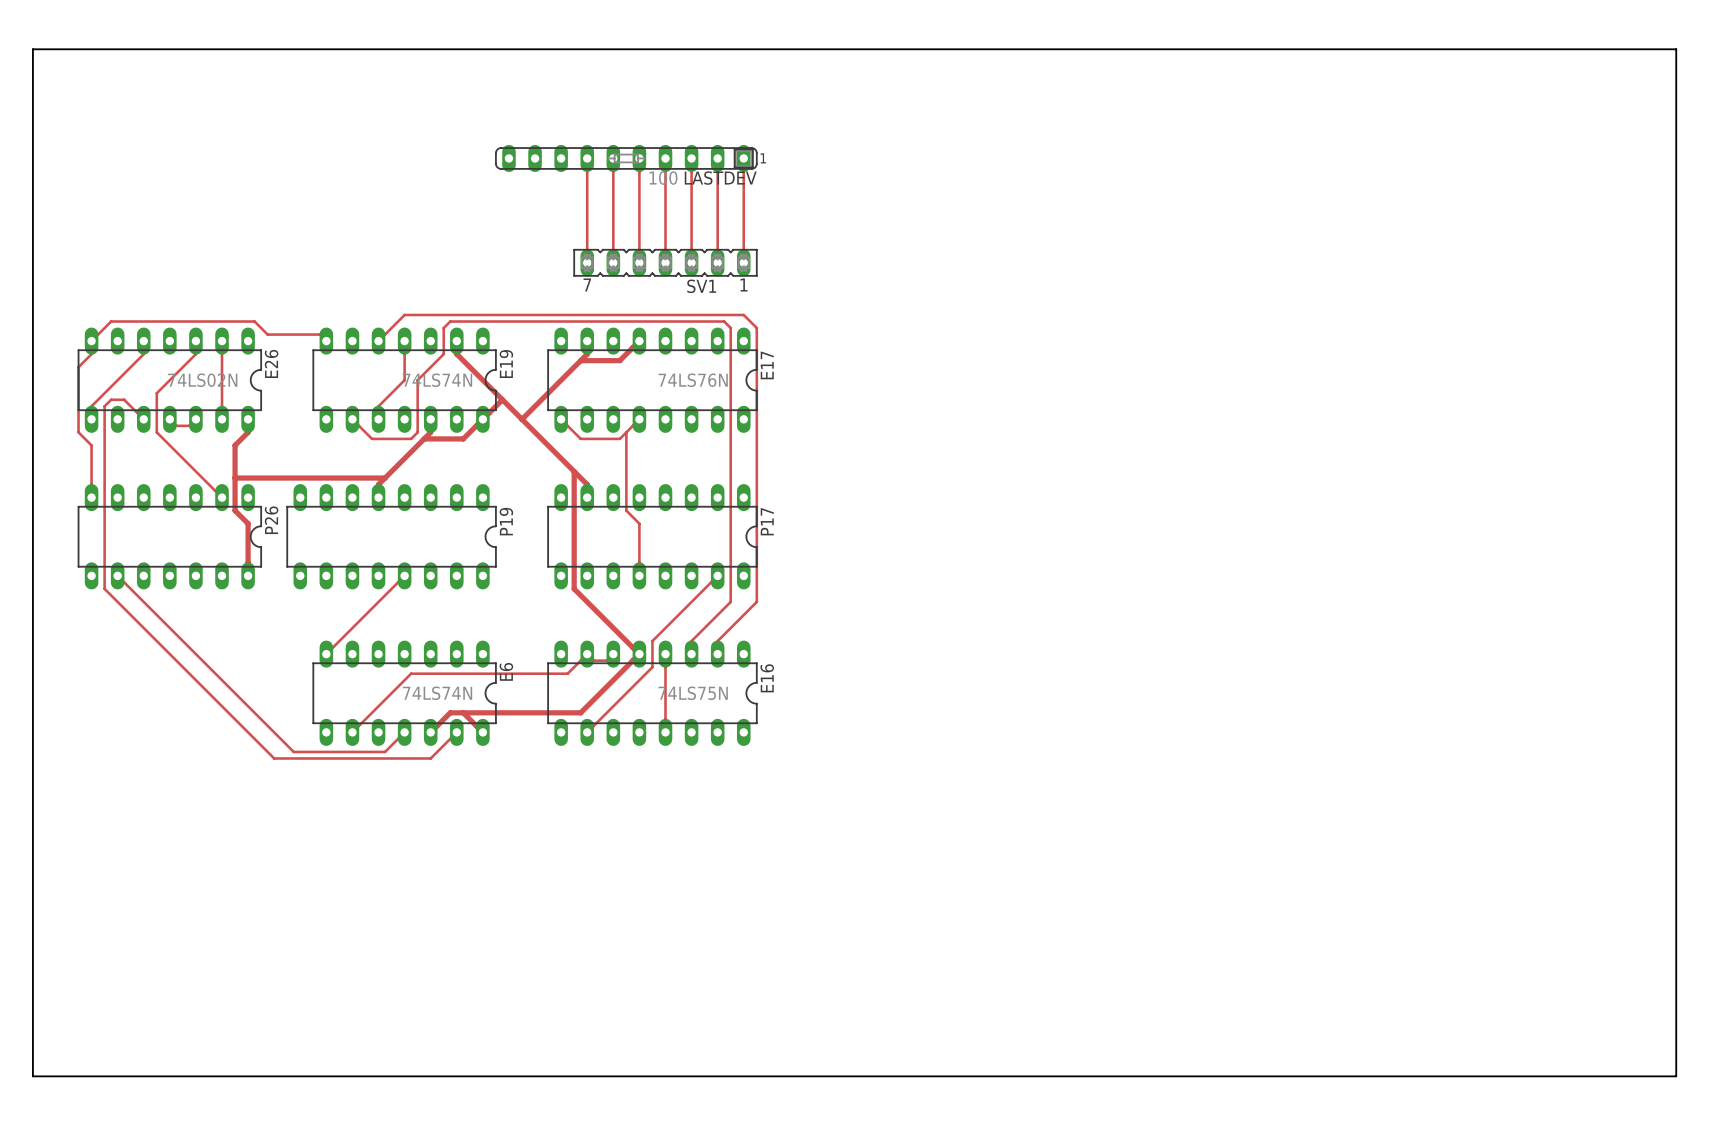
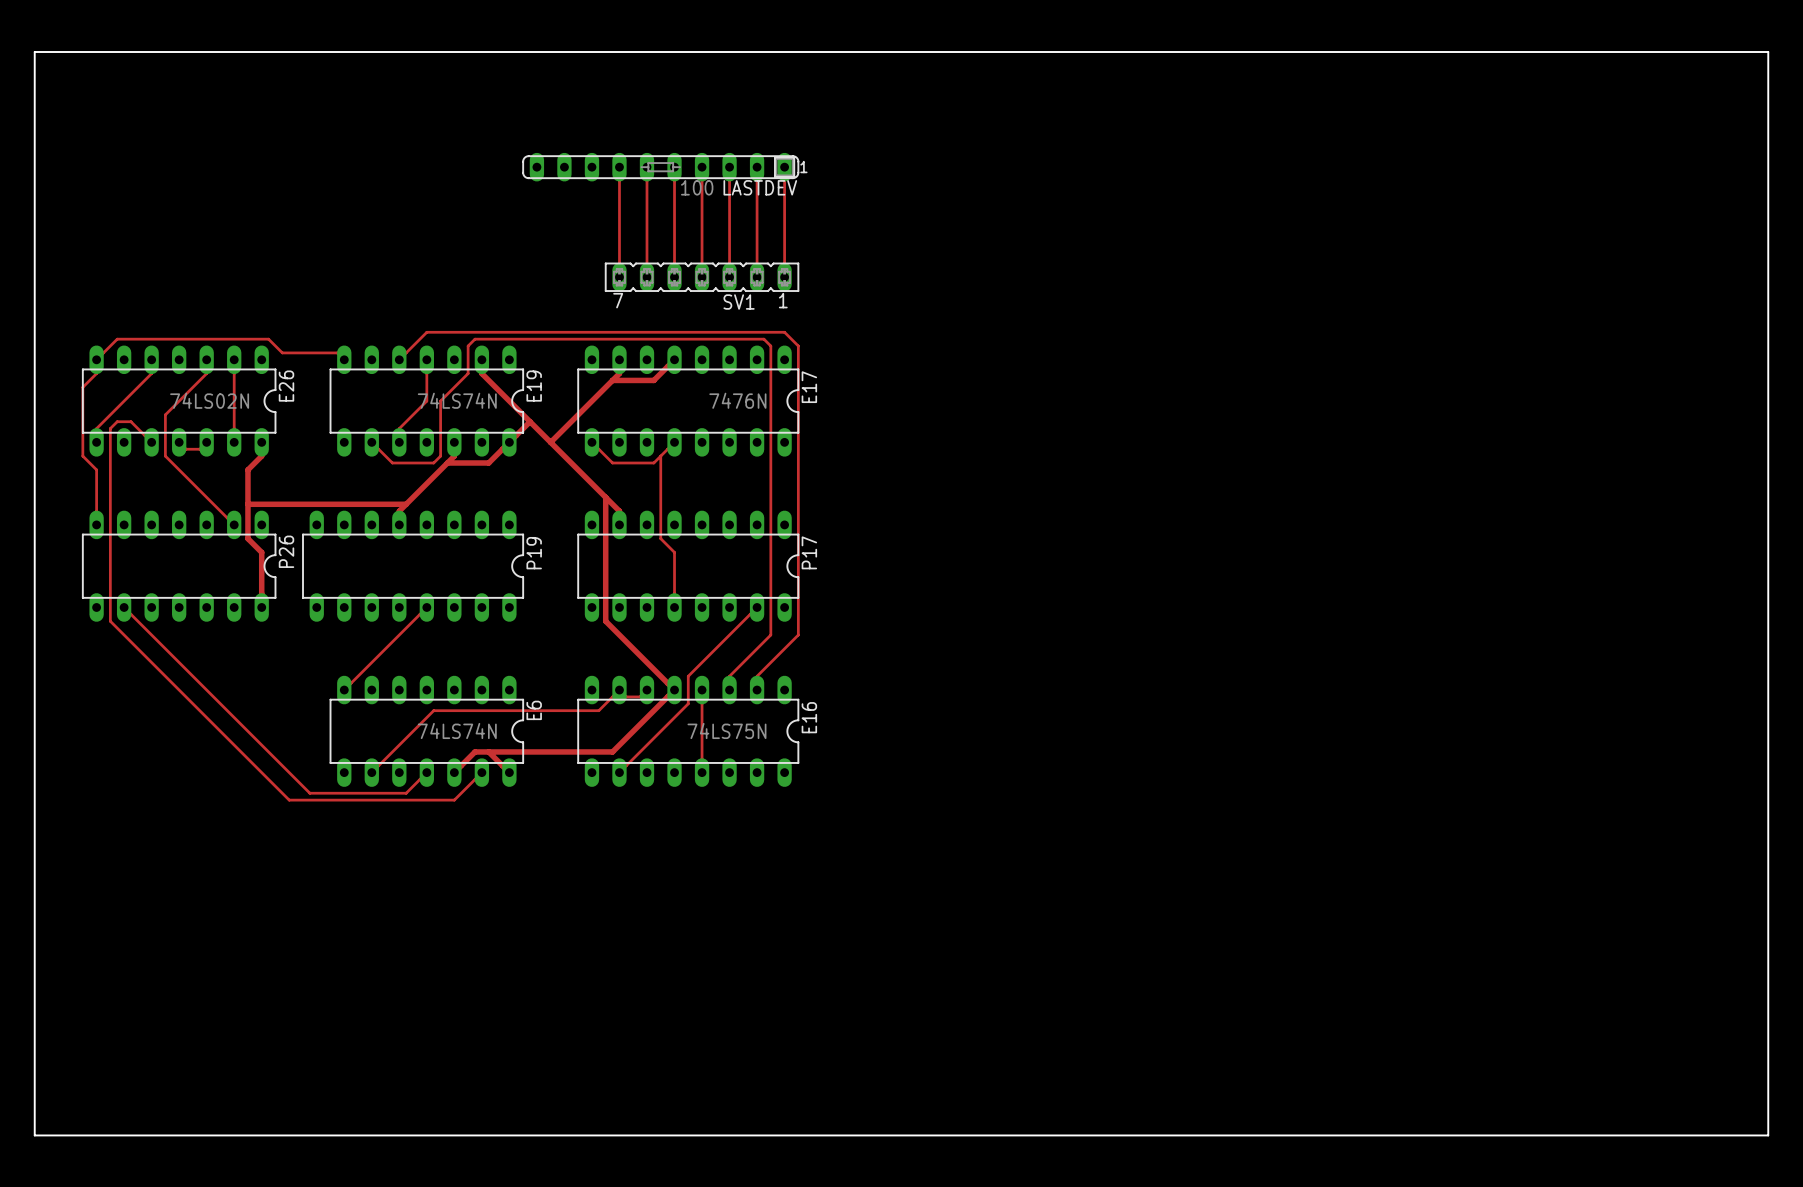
E17 value: 74LS76N (693, 380) -> 7476N (737, 400)

